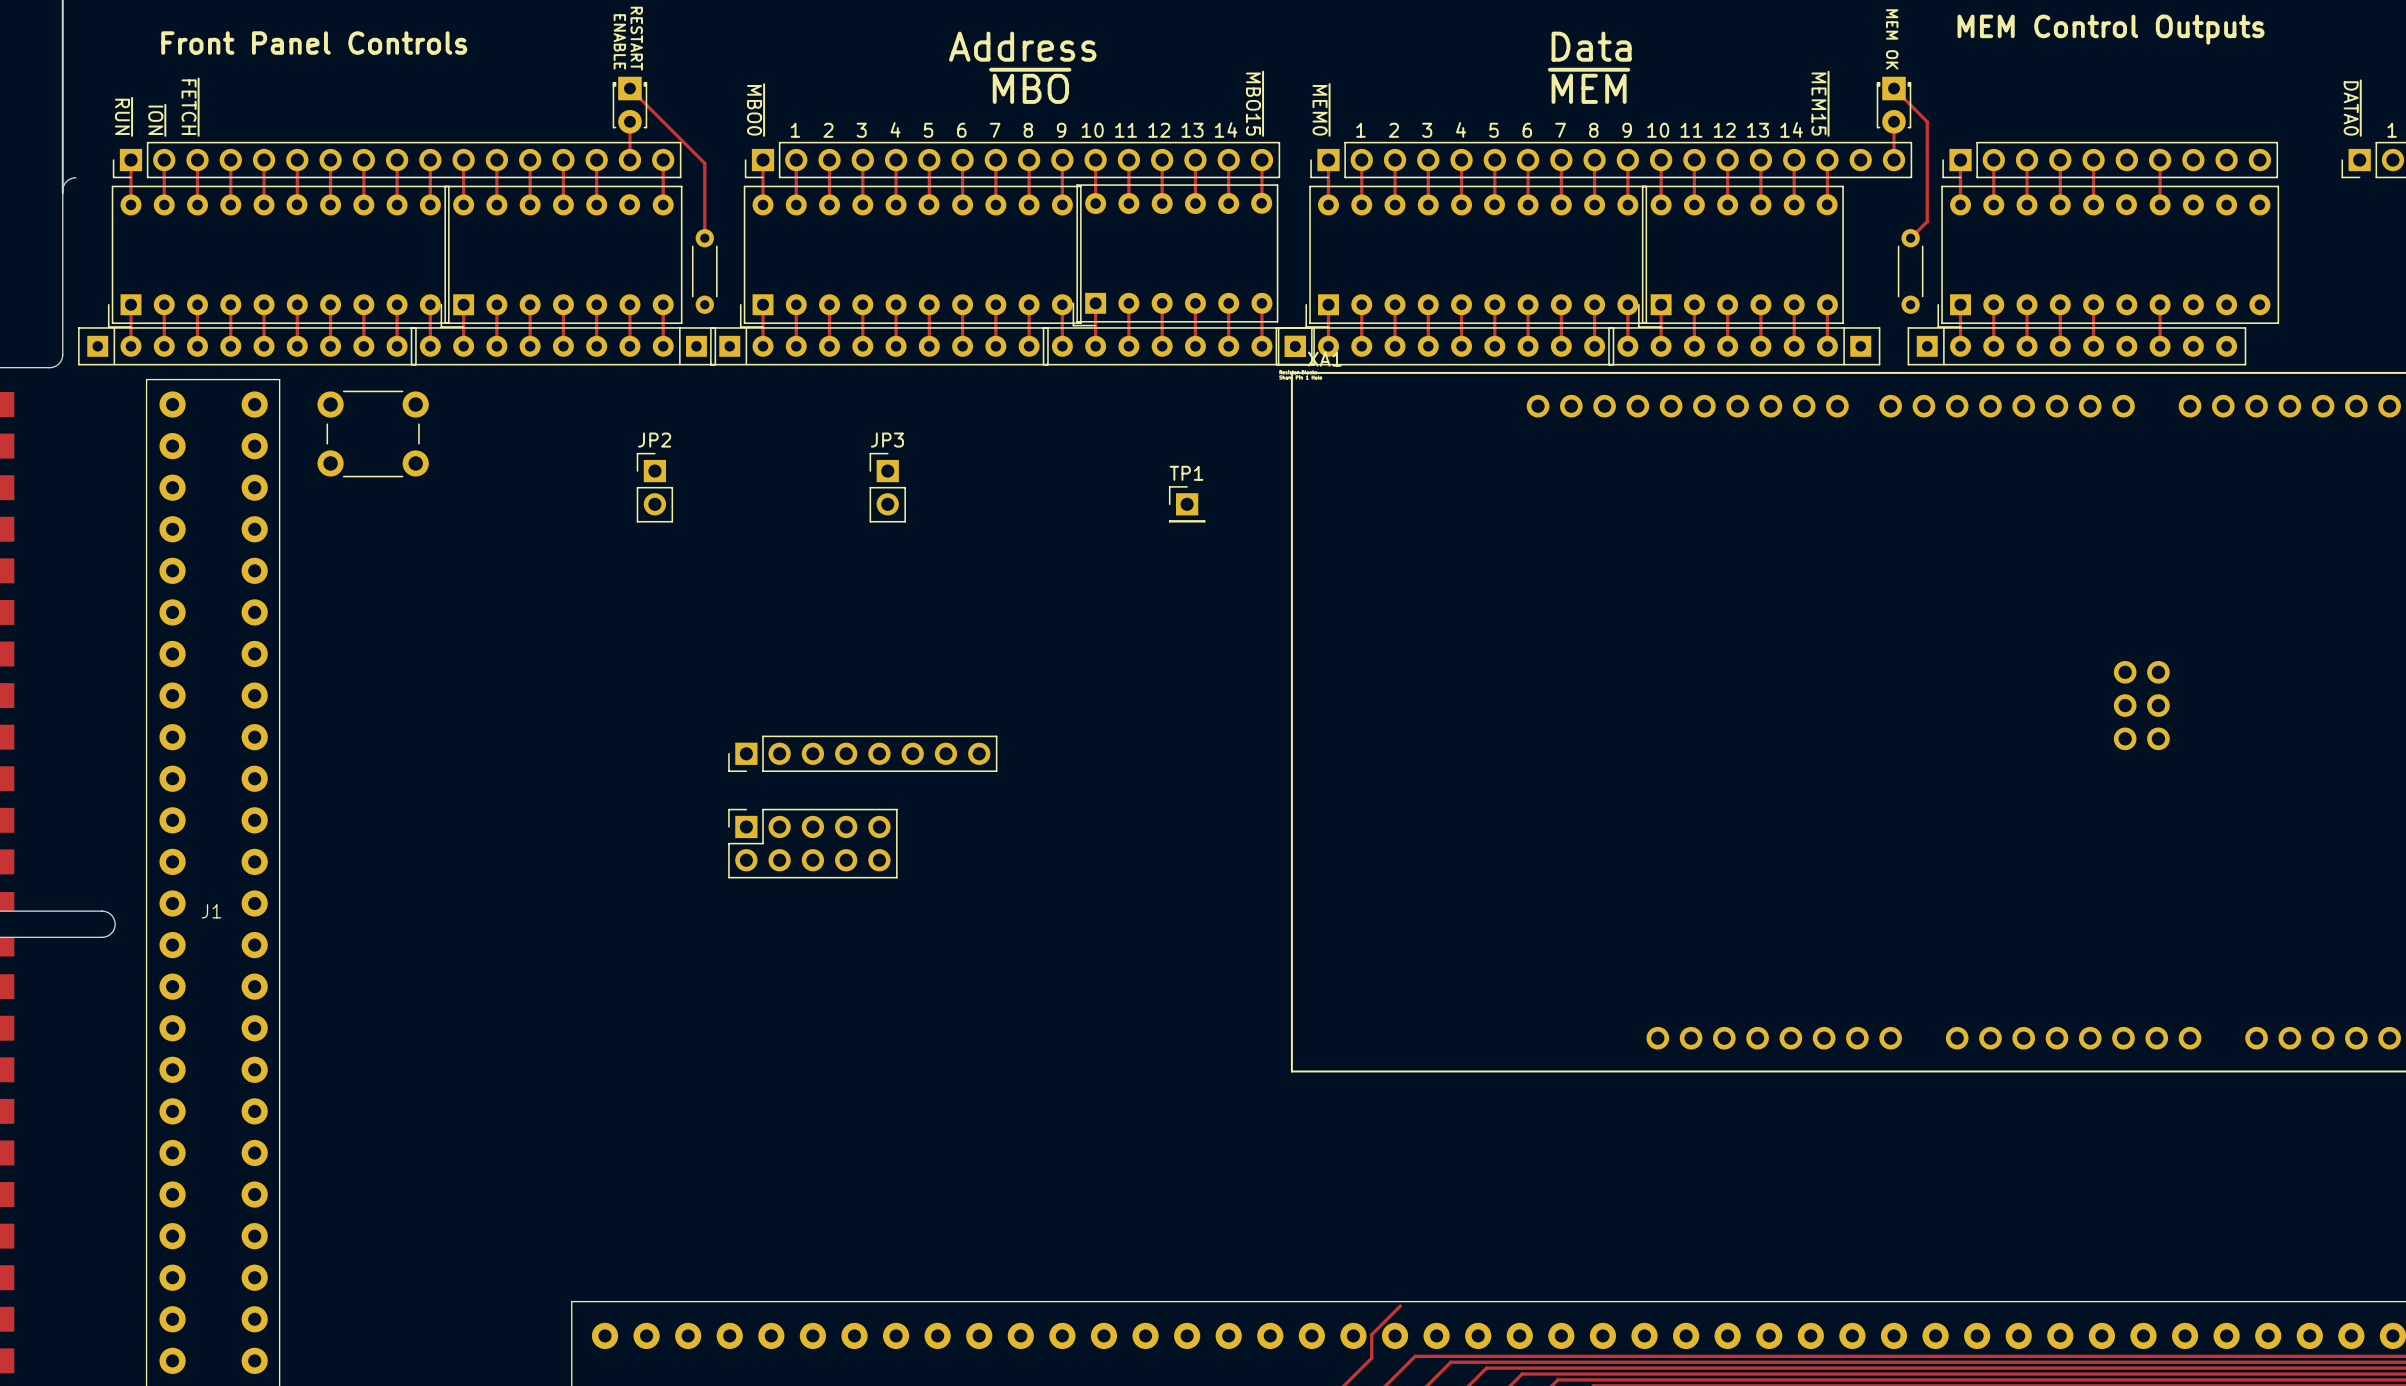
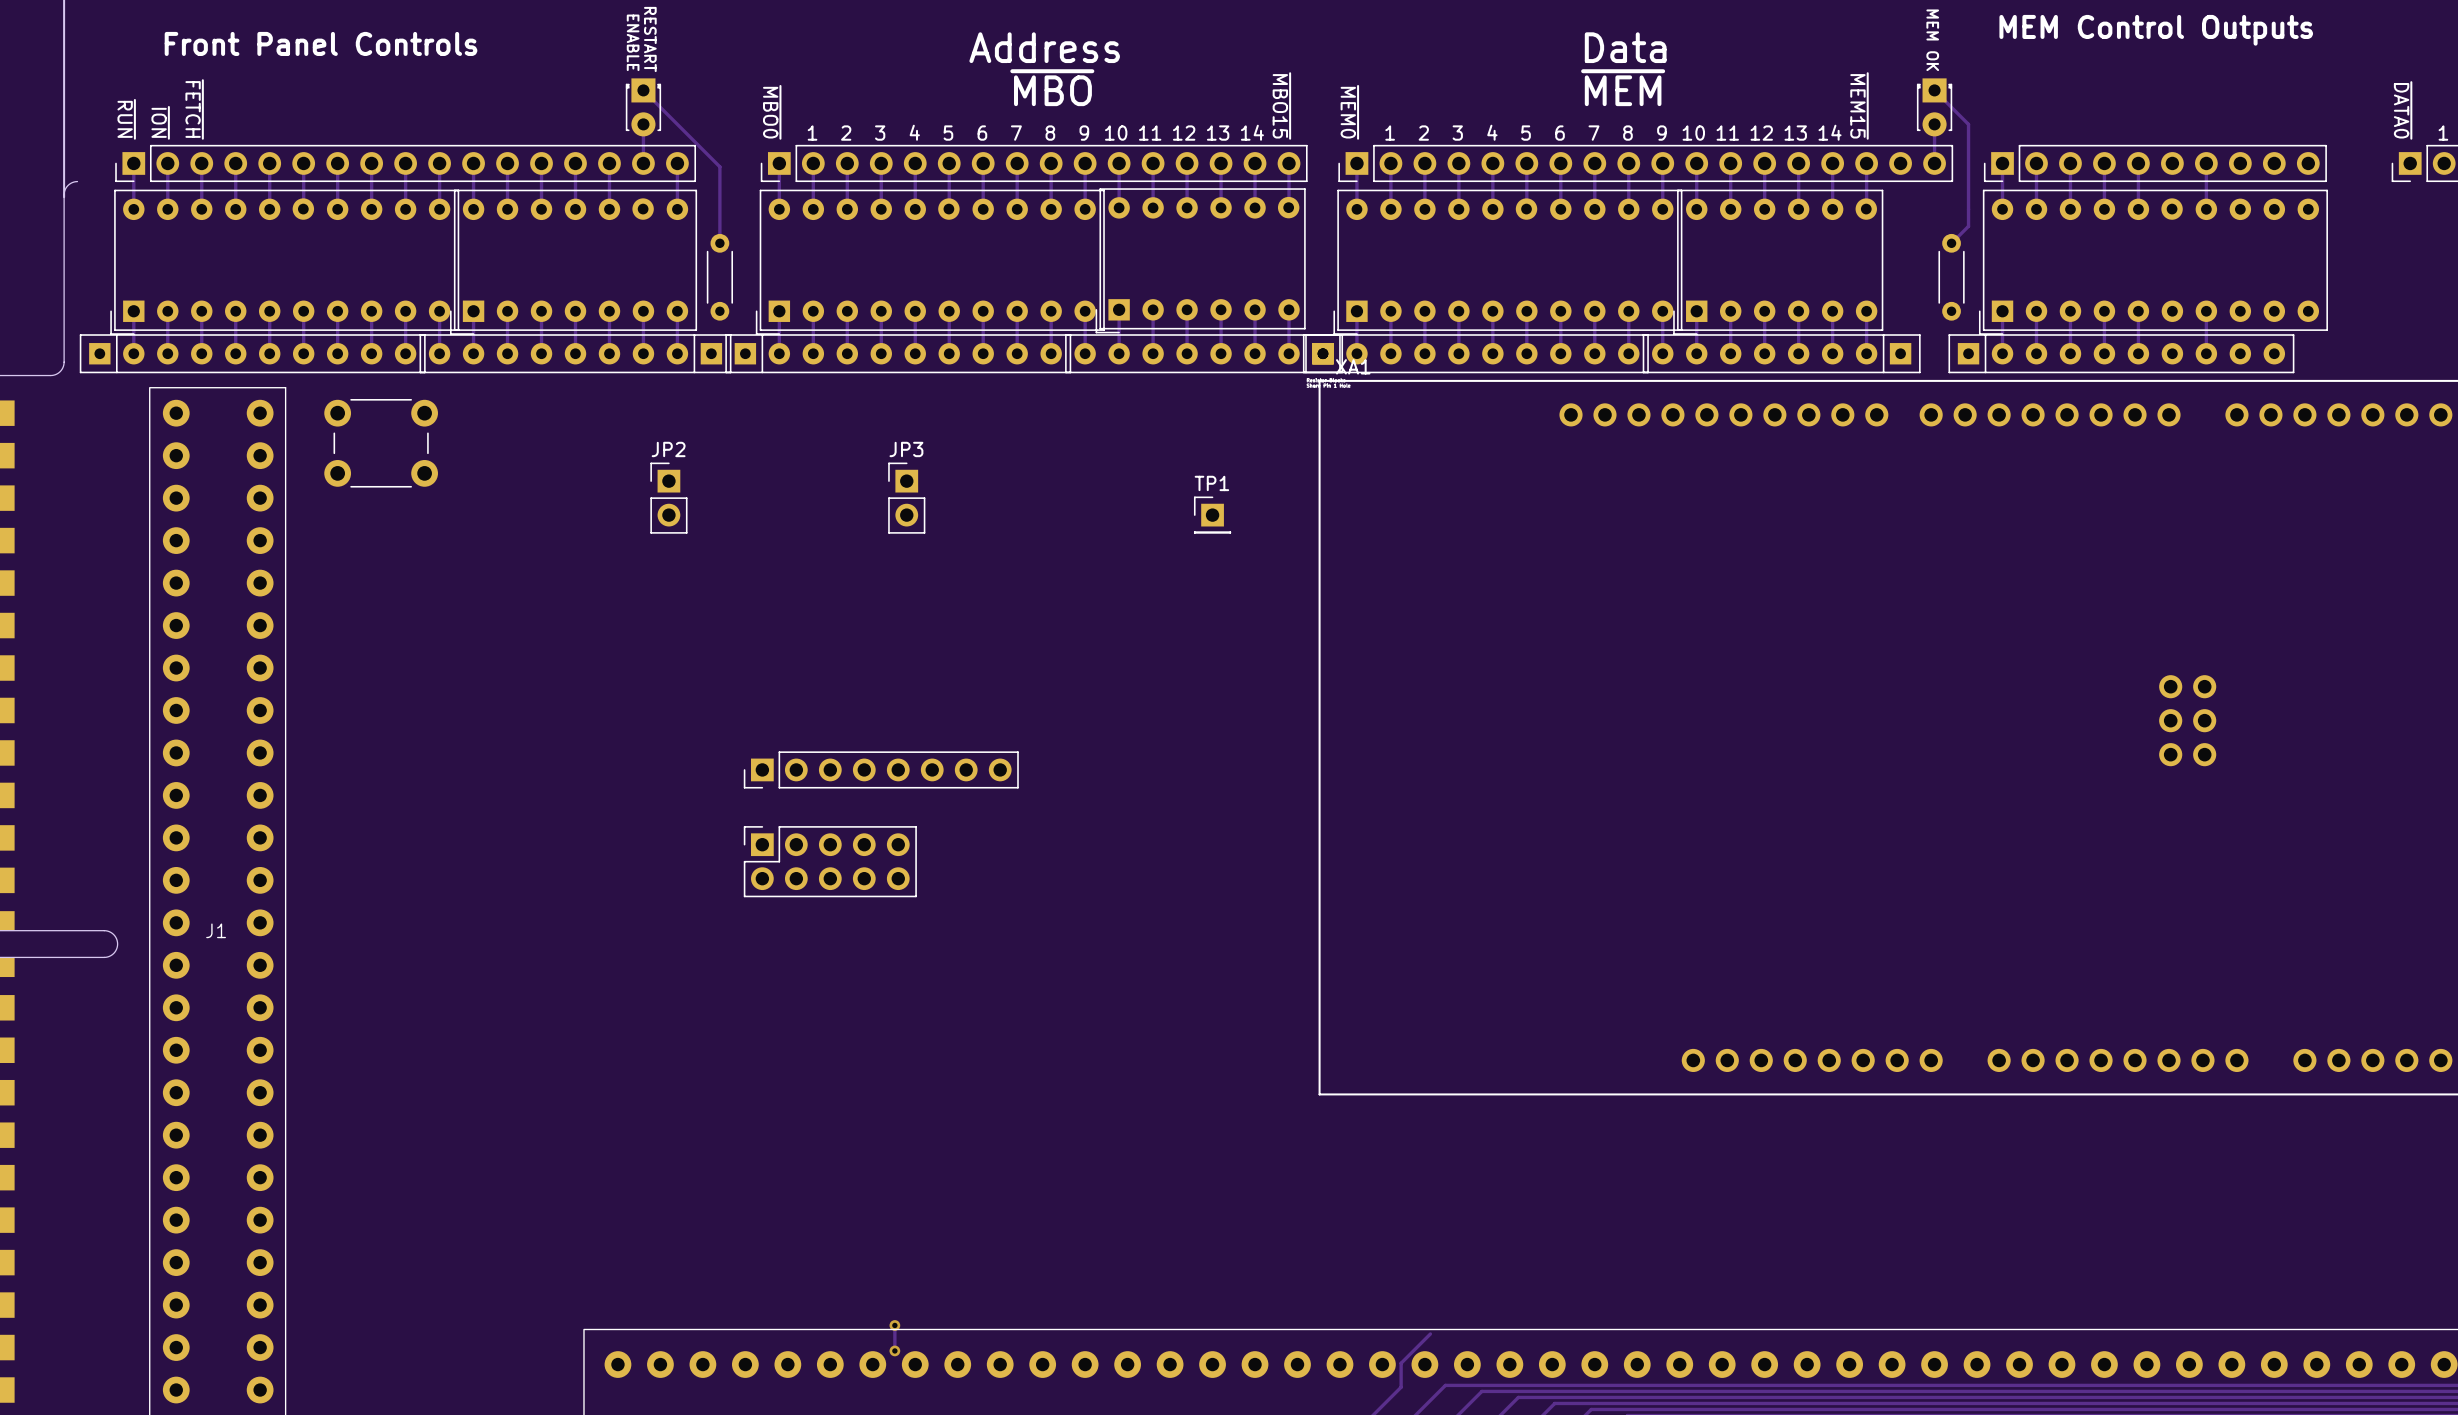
track: none -> (894, 1325) (894, 1350)
via: none -> (894, 1325)
via: none -> (894, 1350)

